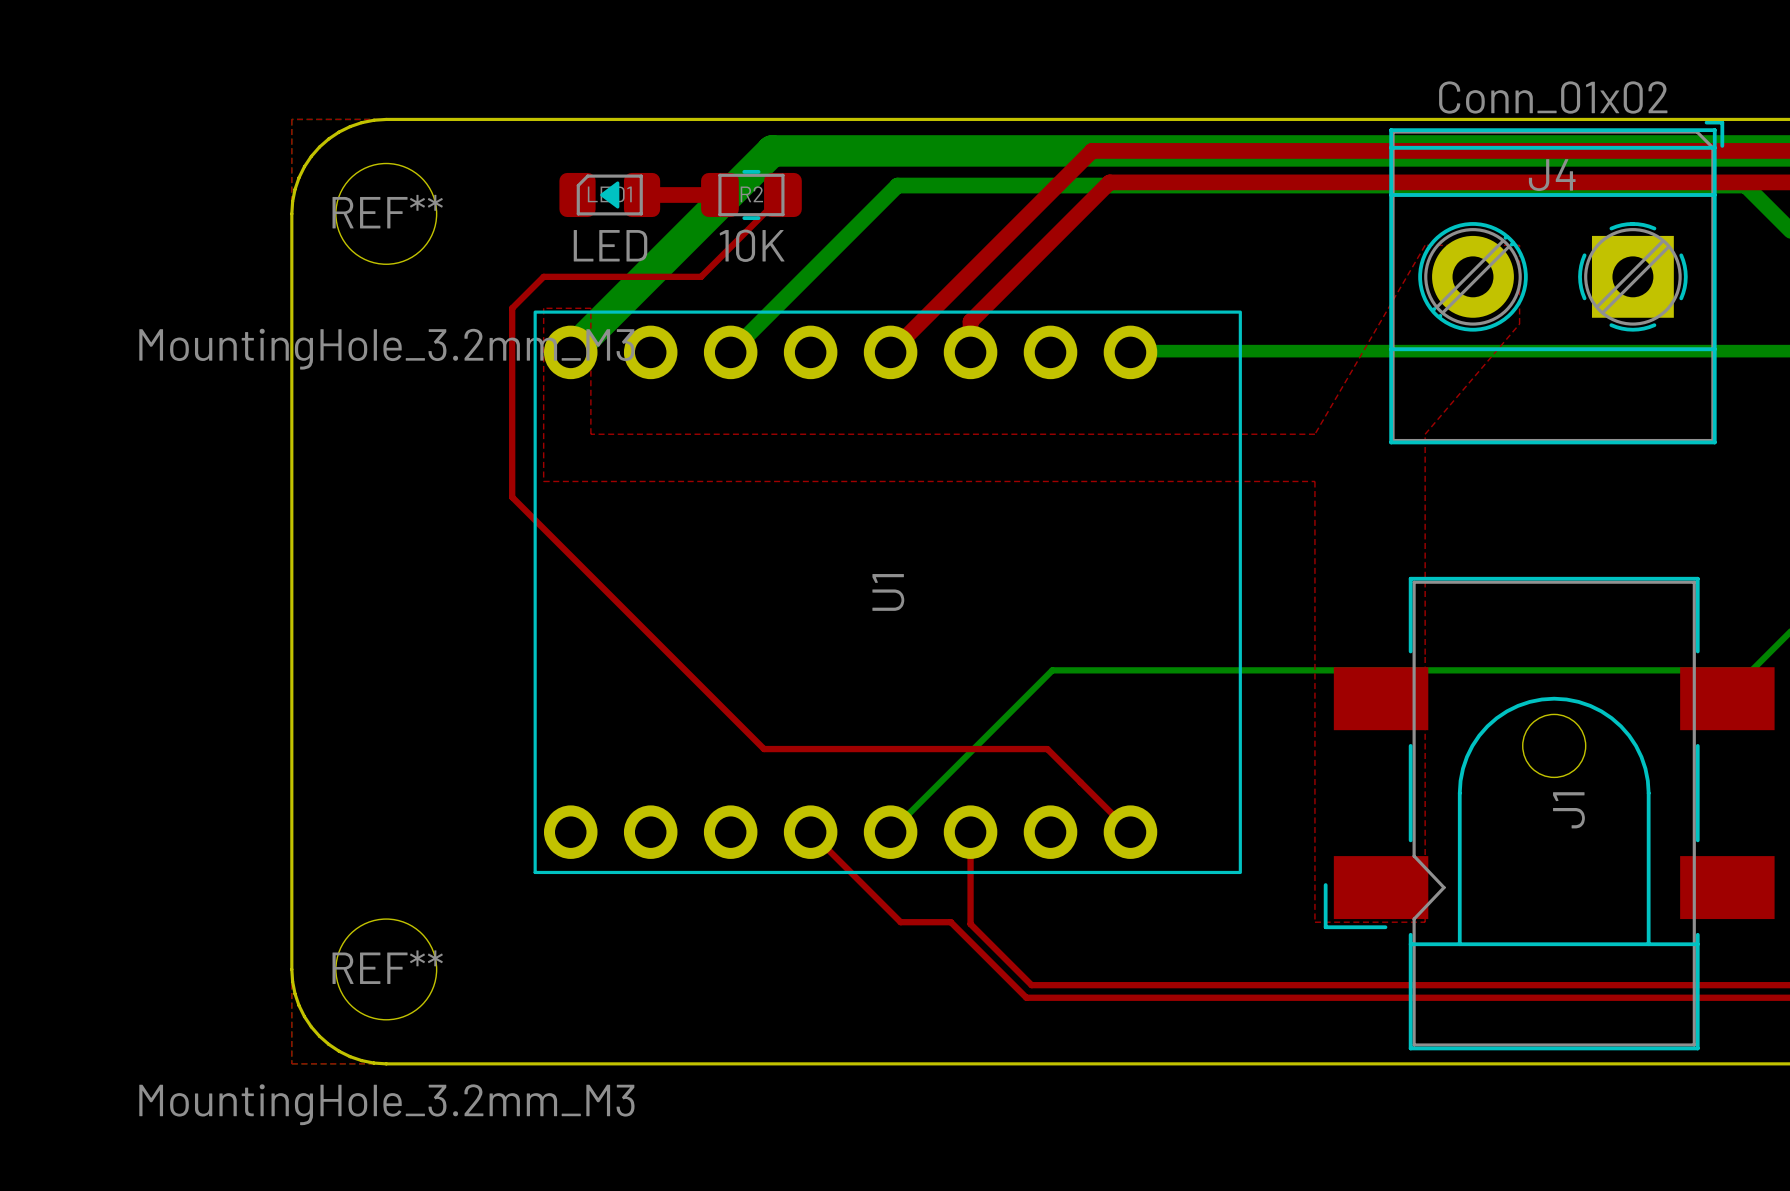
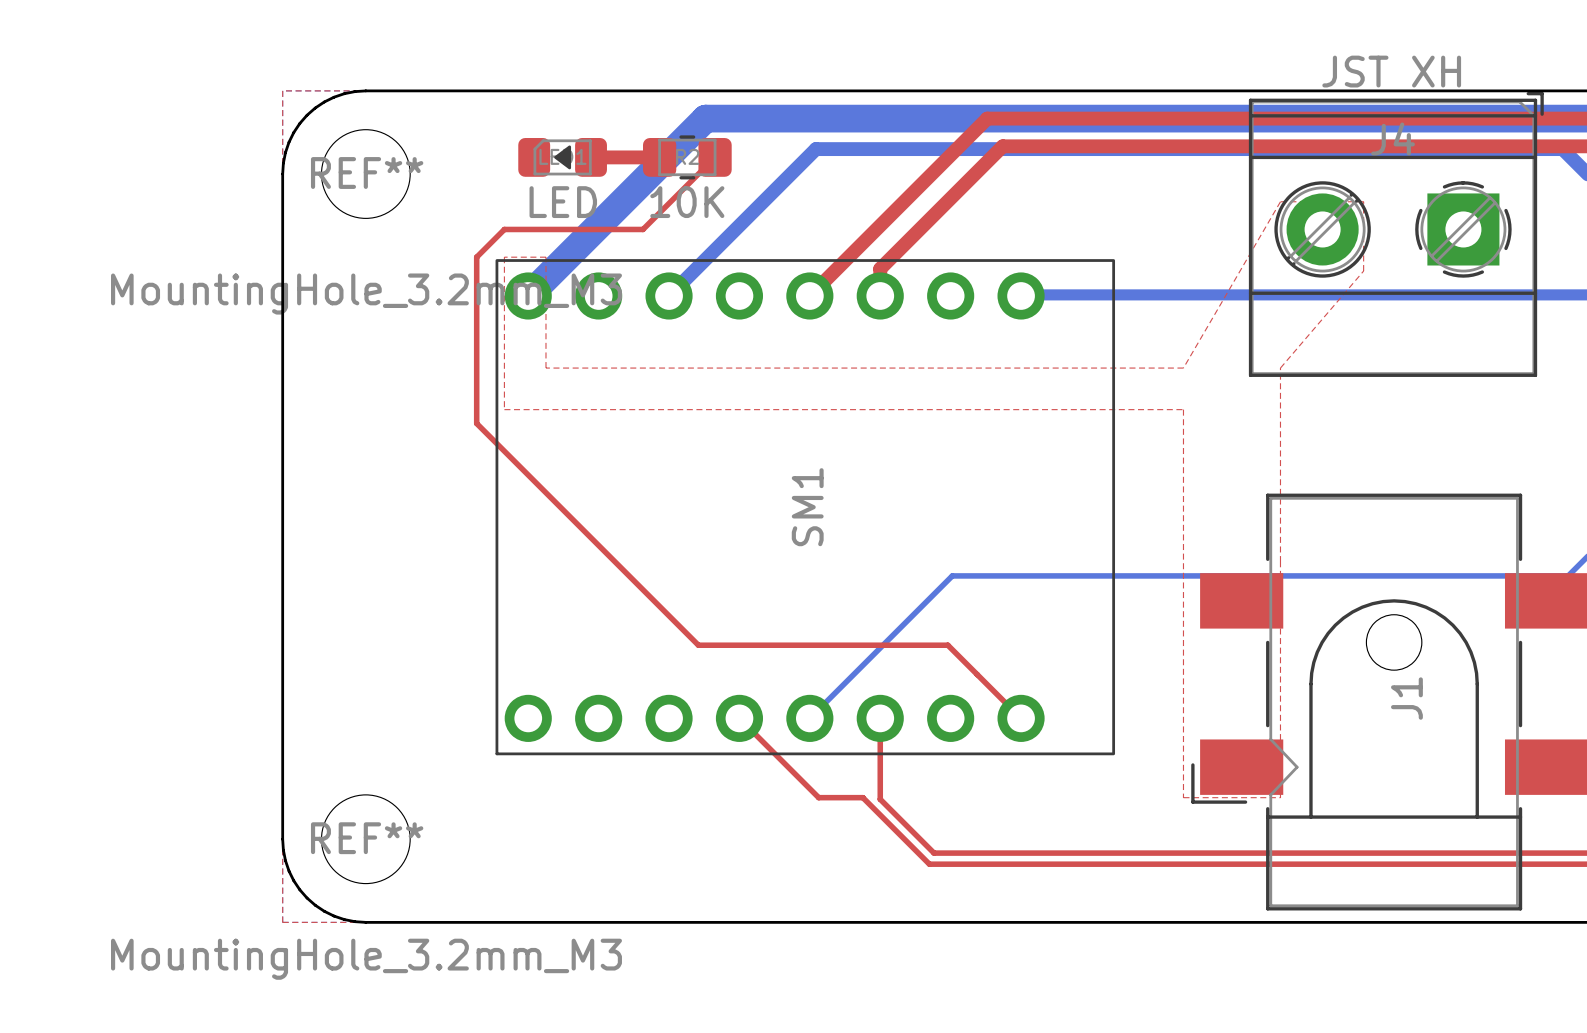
J4 value: Conn_01x02 (1553, 97) -> JST XH (1391, 71)
SM1: none -> (805, 507)
U1: (887, 592) -> none

